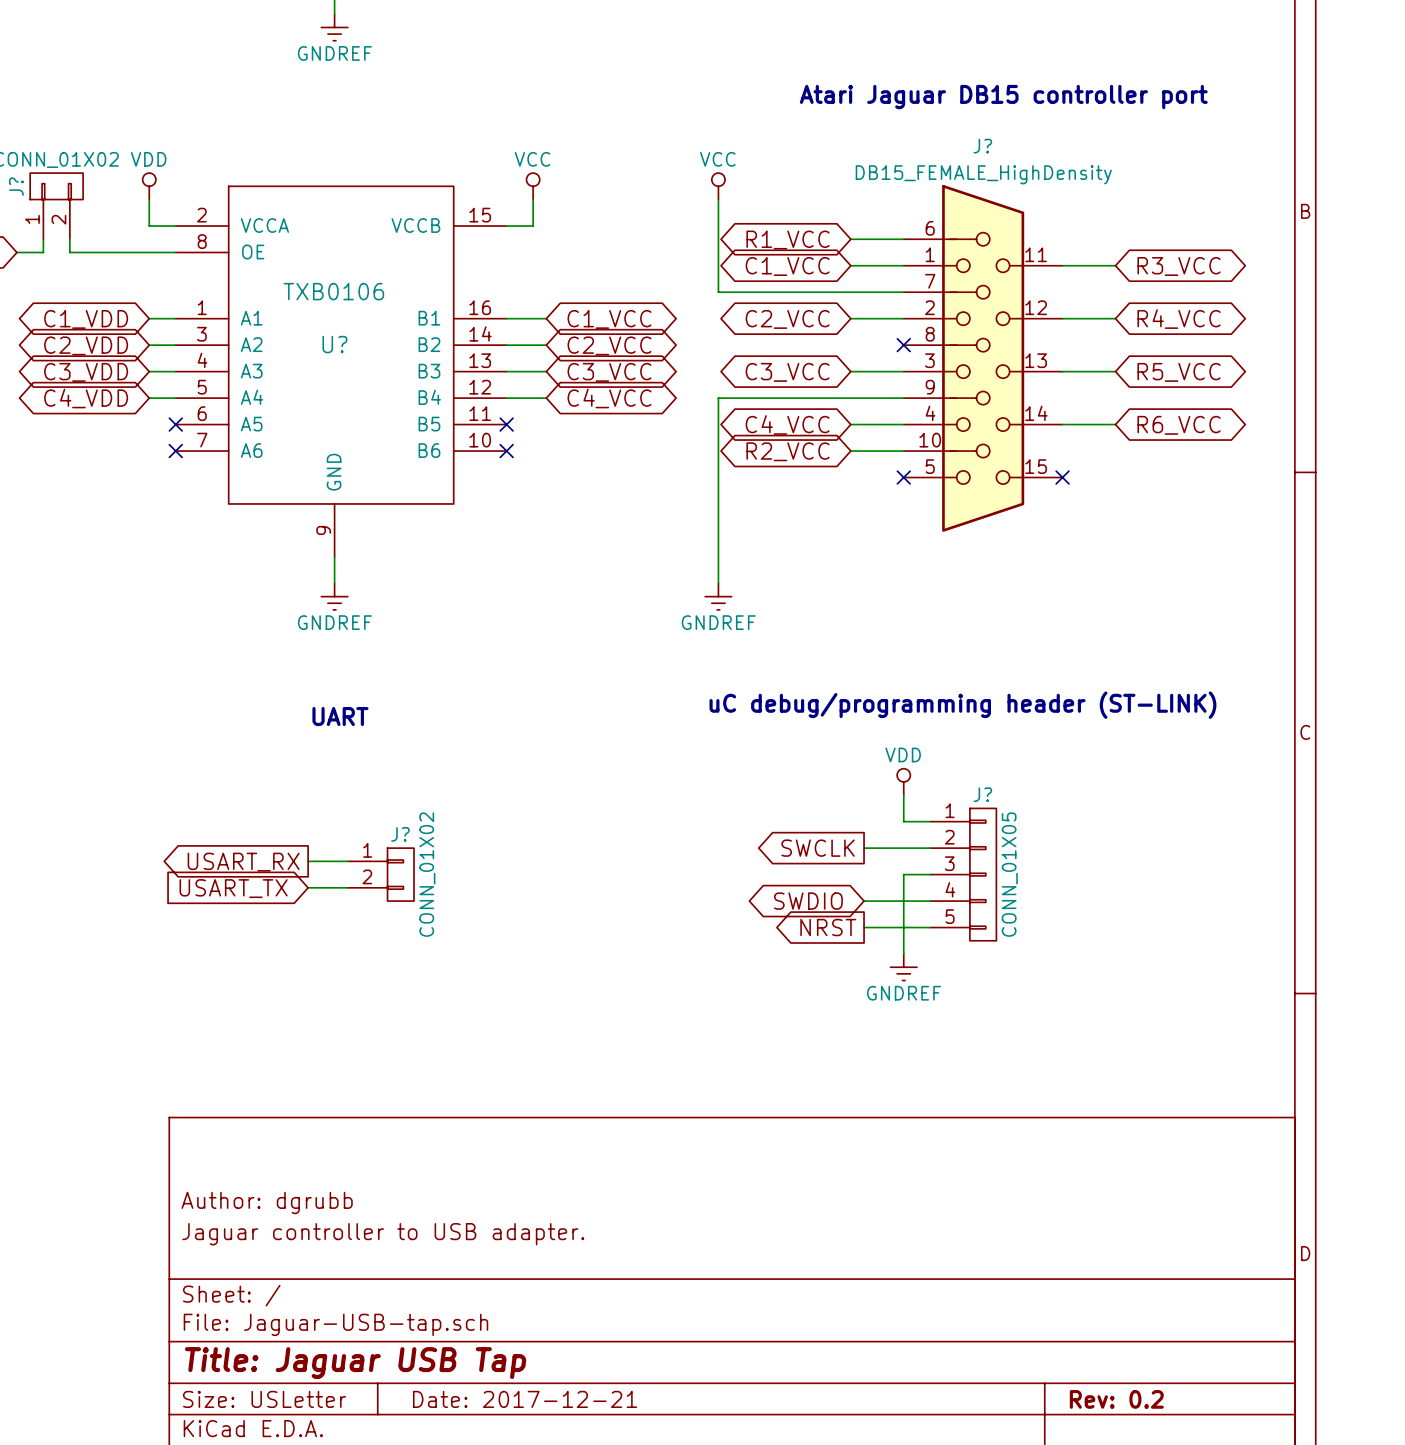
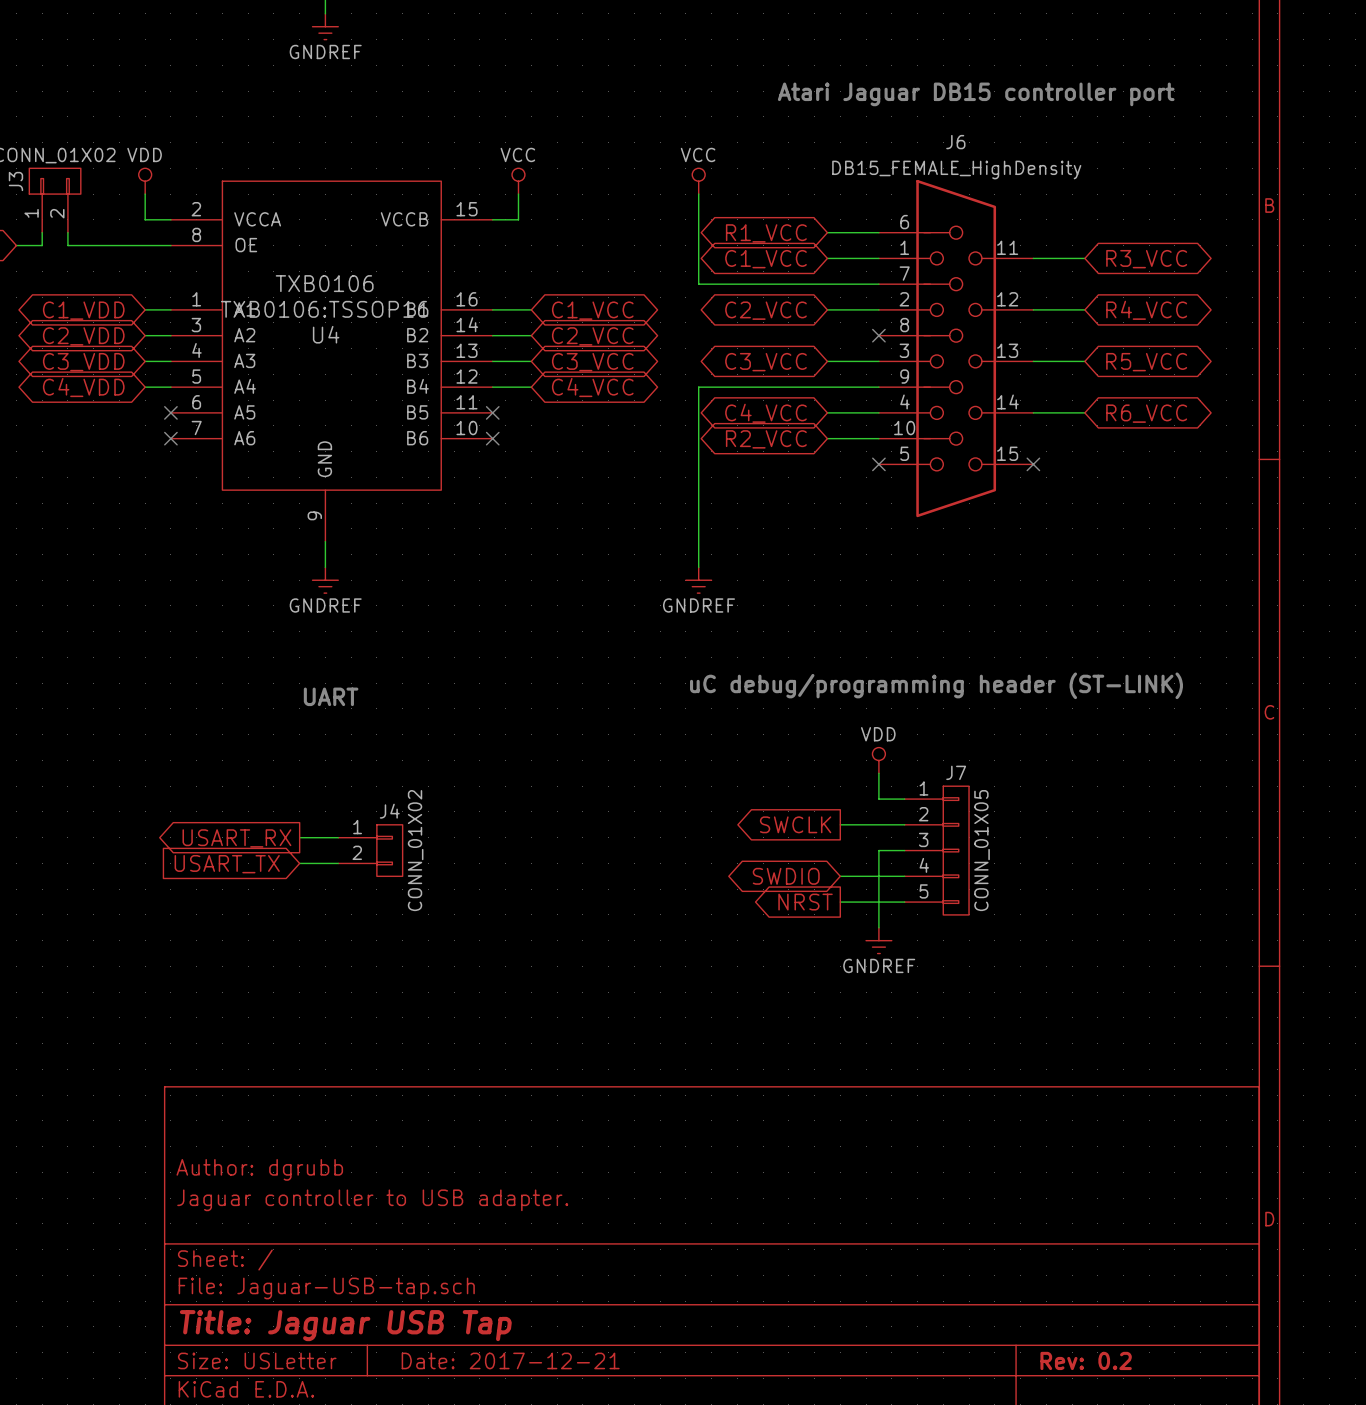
J? name: J? (982, 146) -> J6 (955, 142)
J? name: J? (16, 186) -> J3 (15, 181)
U? text: none -> TXB0106:TSSOP16 (324, 309)
U? name: U? (334, 344) -> U4 (326, 334)
J? name: J? (982, 794) -> J7 (956, 772)
J? name: J? (400, 834) -> J4 (389, 811)

